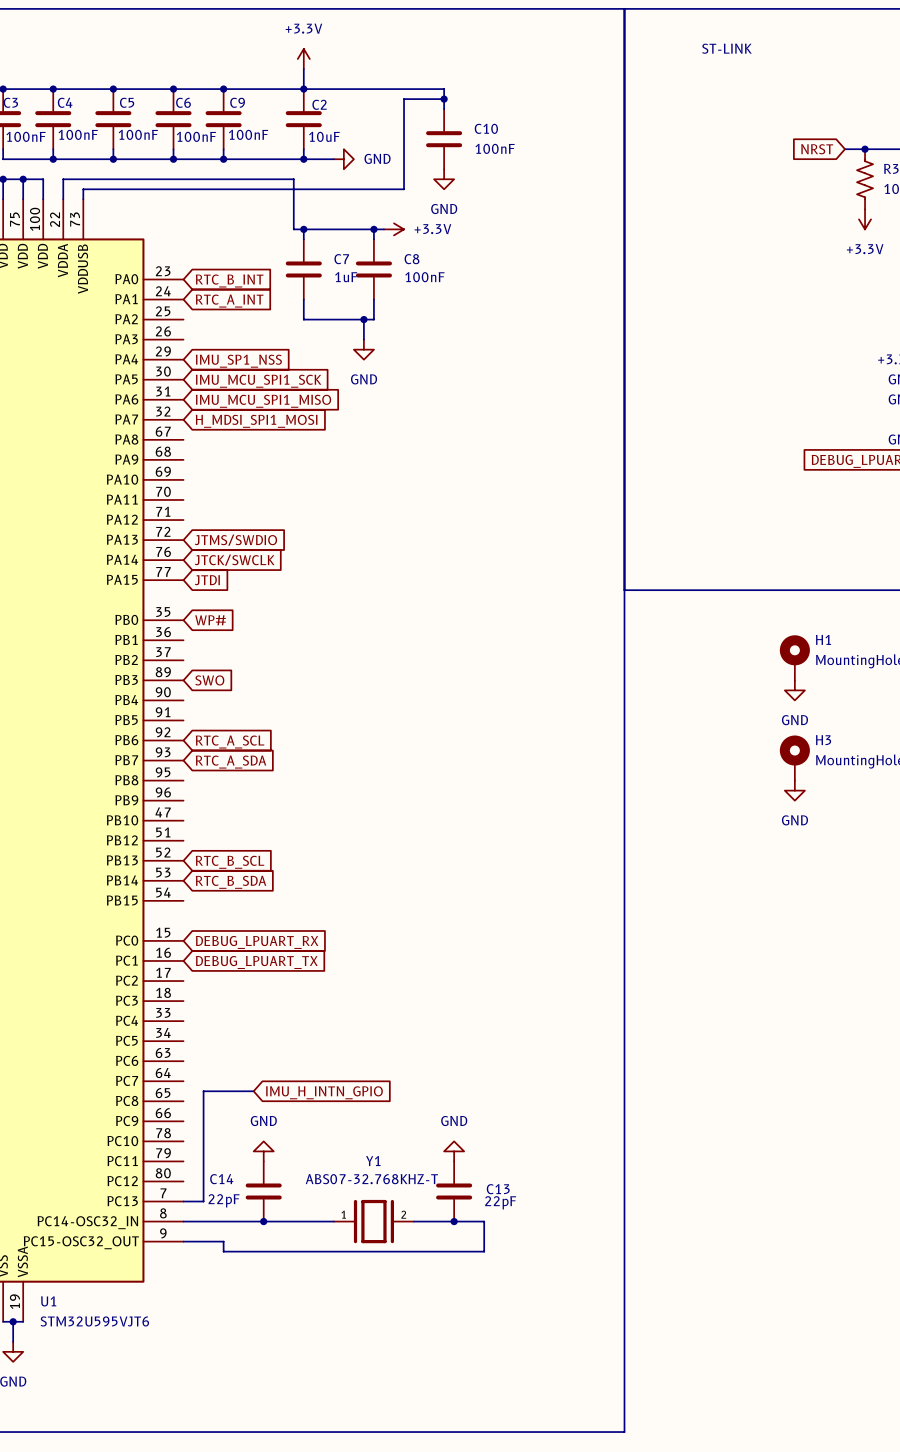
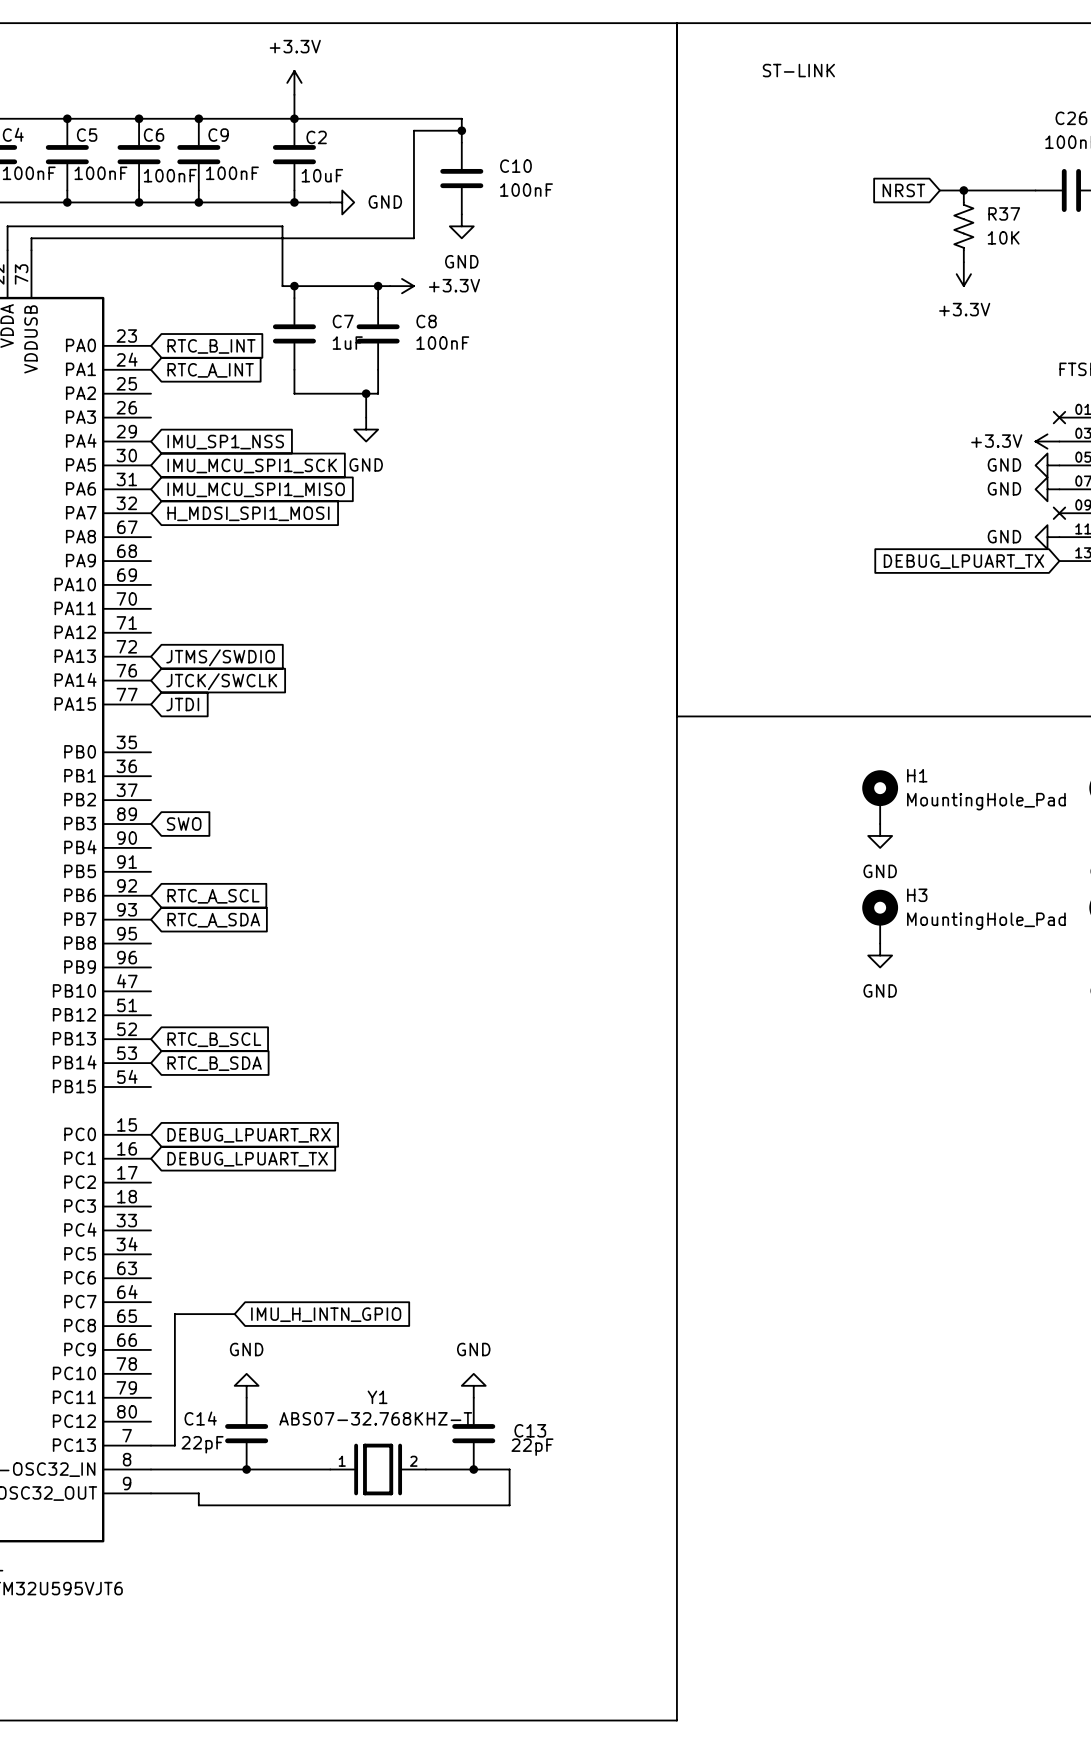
global label: WP# (210, 620) -> none

